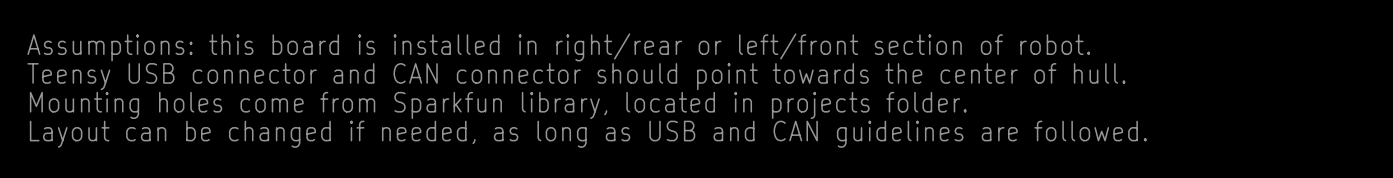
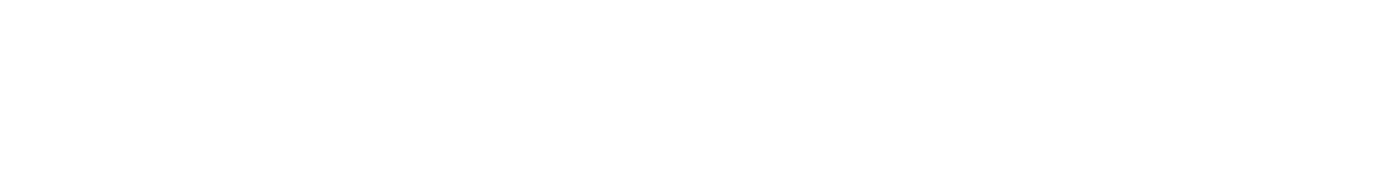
text: Assumptions: this board is installed in right/rear or left/front section of robot. (558, 47) -> none
text: Teensy USB connector and CAN connector should point towards the center of hull. (576, 76) -> none
text: Mounting holes come from Sparkfun library, located in projects folder. (498, 105) -> none
text: Layout can be changed if needed, as long as USB and CAN guidelines are followed. (588, 134) -> none

